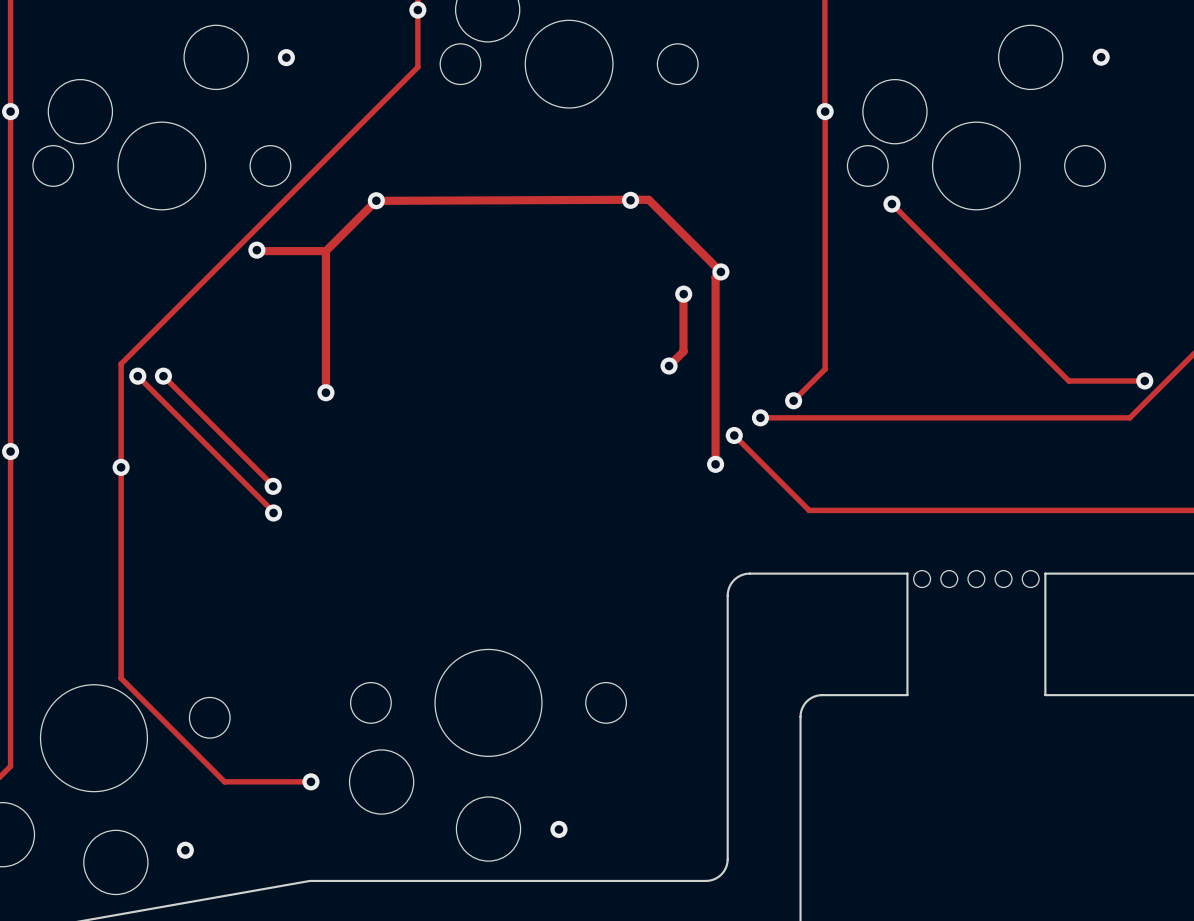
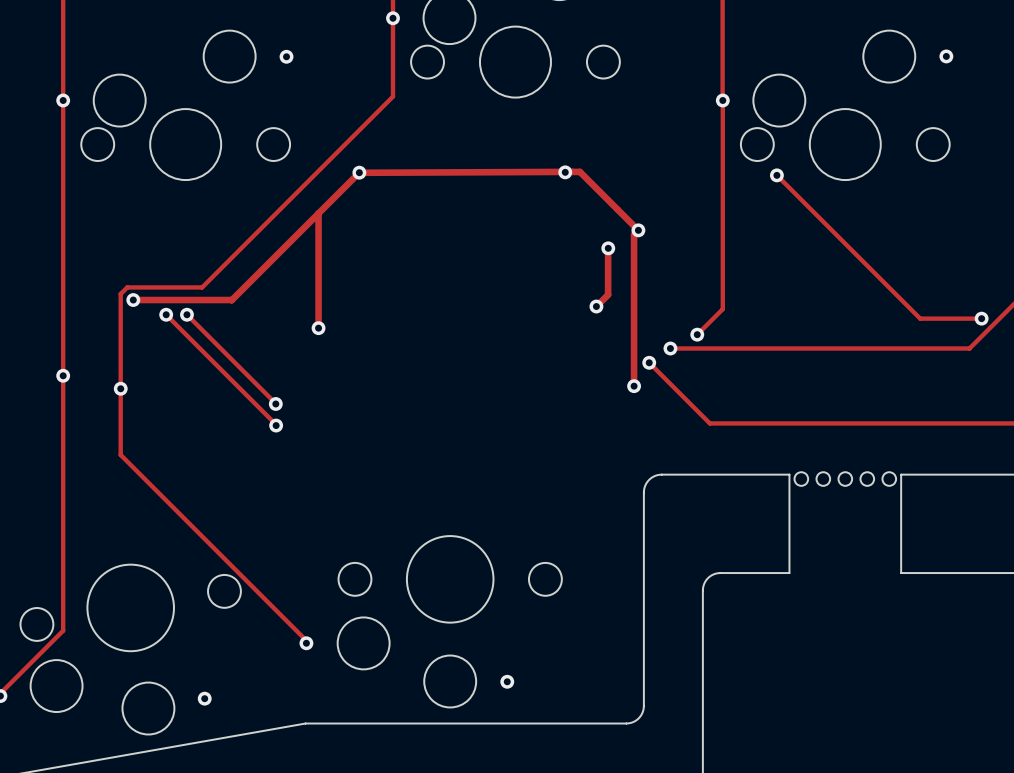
track: (417, 67) (121, 363) (121, 678) (224, 781) (310, 781) -> (392, 64) (392, 96) (202, 287) (127, 287) (120, 294) (120, 454) (306, 640) (306, 643)
track: (256, 250) (325, 251) -> (231, 300) (318, 213)
via: (256, 250) -> none
track: none -> (133, 300) (231, 300)
via: none -> (133, 300)
via position: (121, 467) -> (120, 388)

